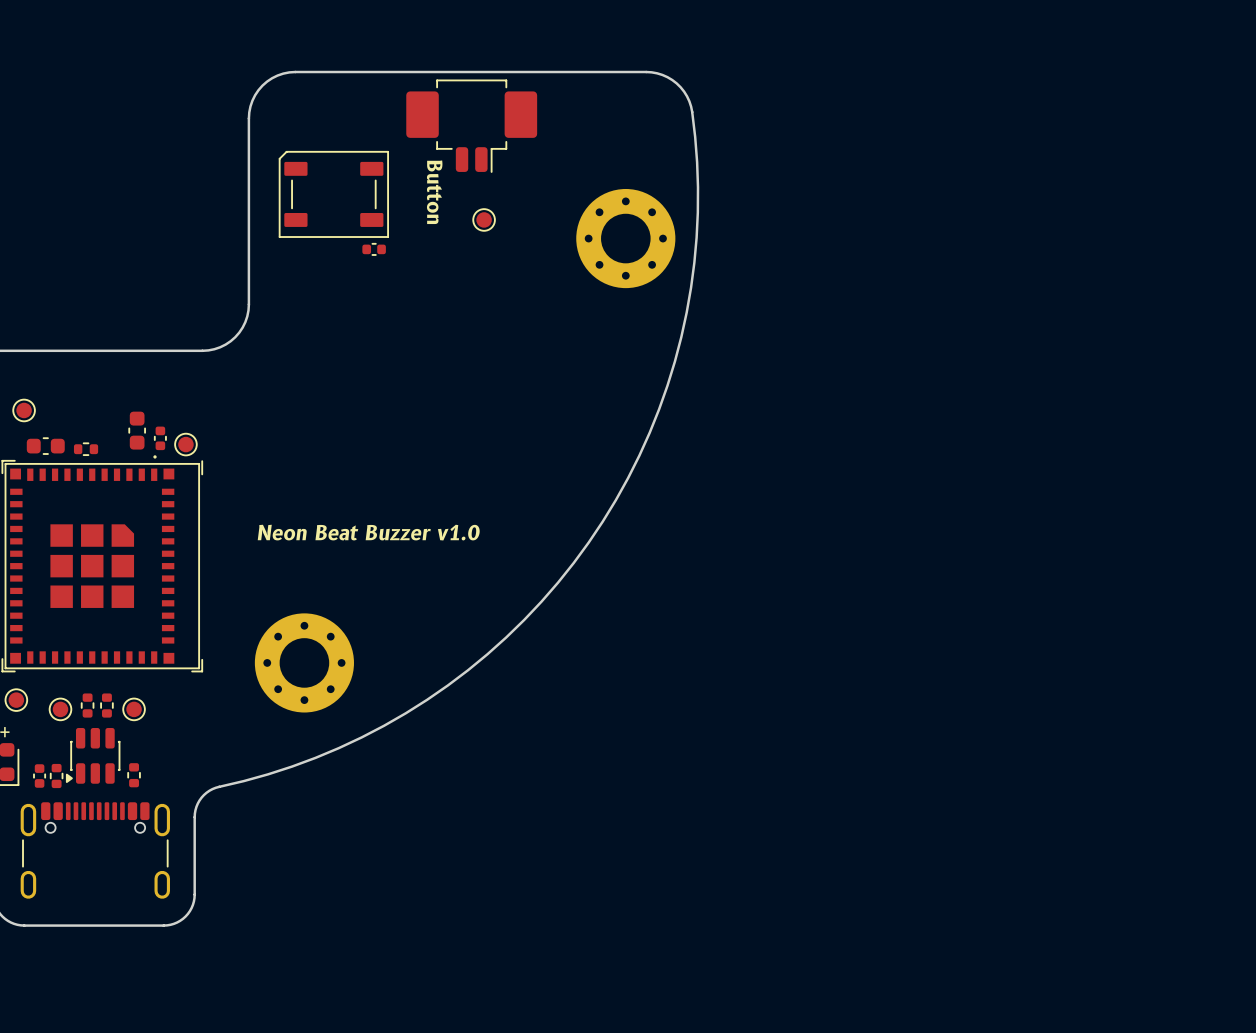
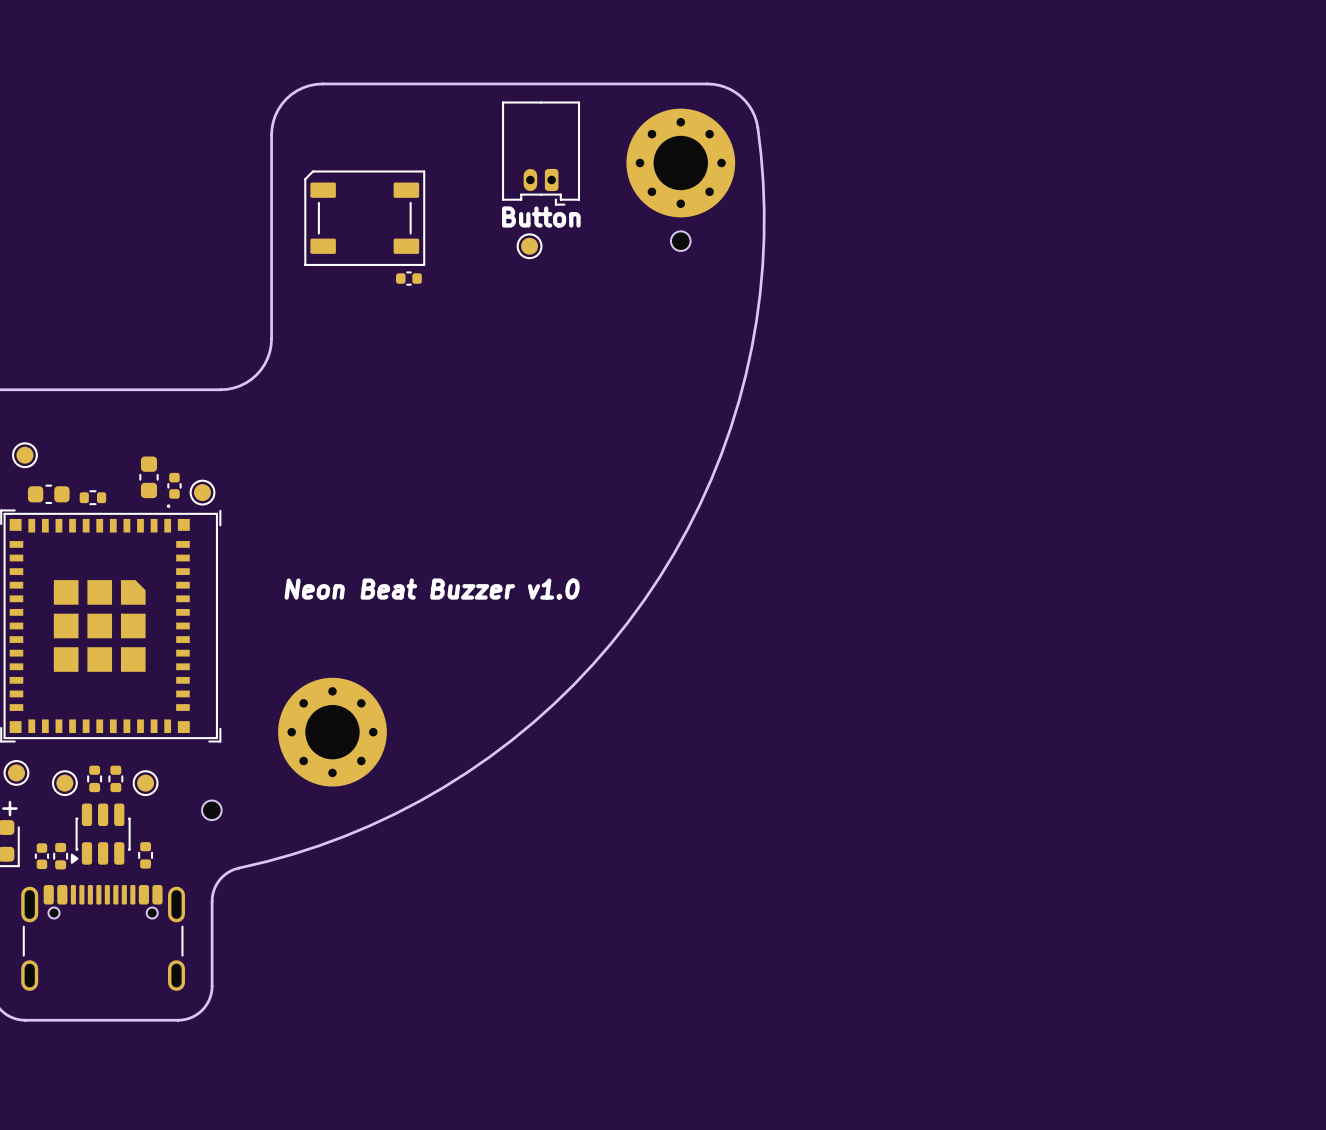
part: (471, 126) -> none
part: none -> (541, 153)
text rotation: 0° (434, 192) -> 90° counterclockwise (541, 216)
part: none -> (680, 241)
part position: (625, 238) -> (680, 163)
part: none -> (211, 810)

